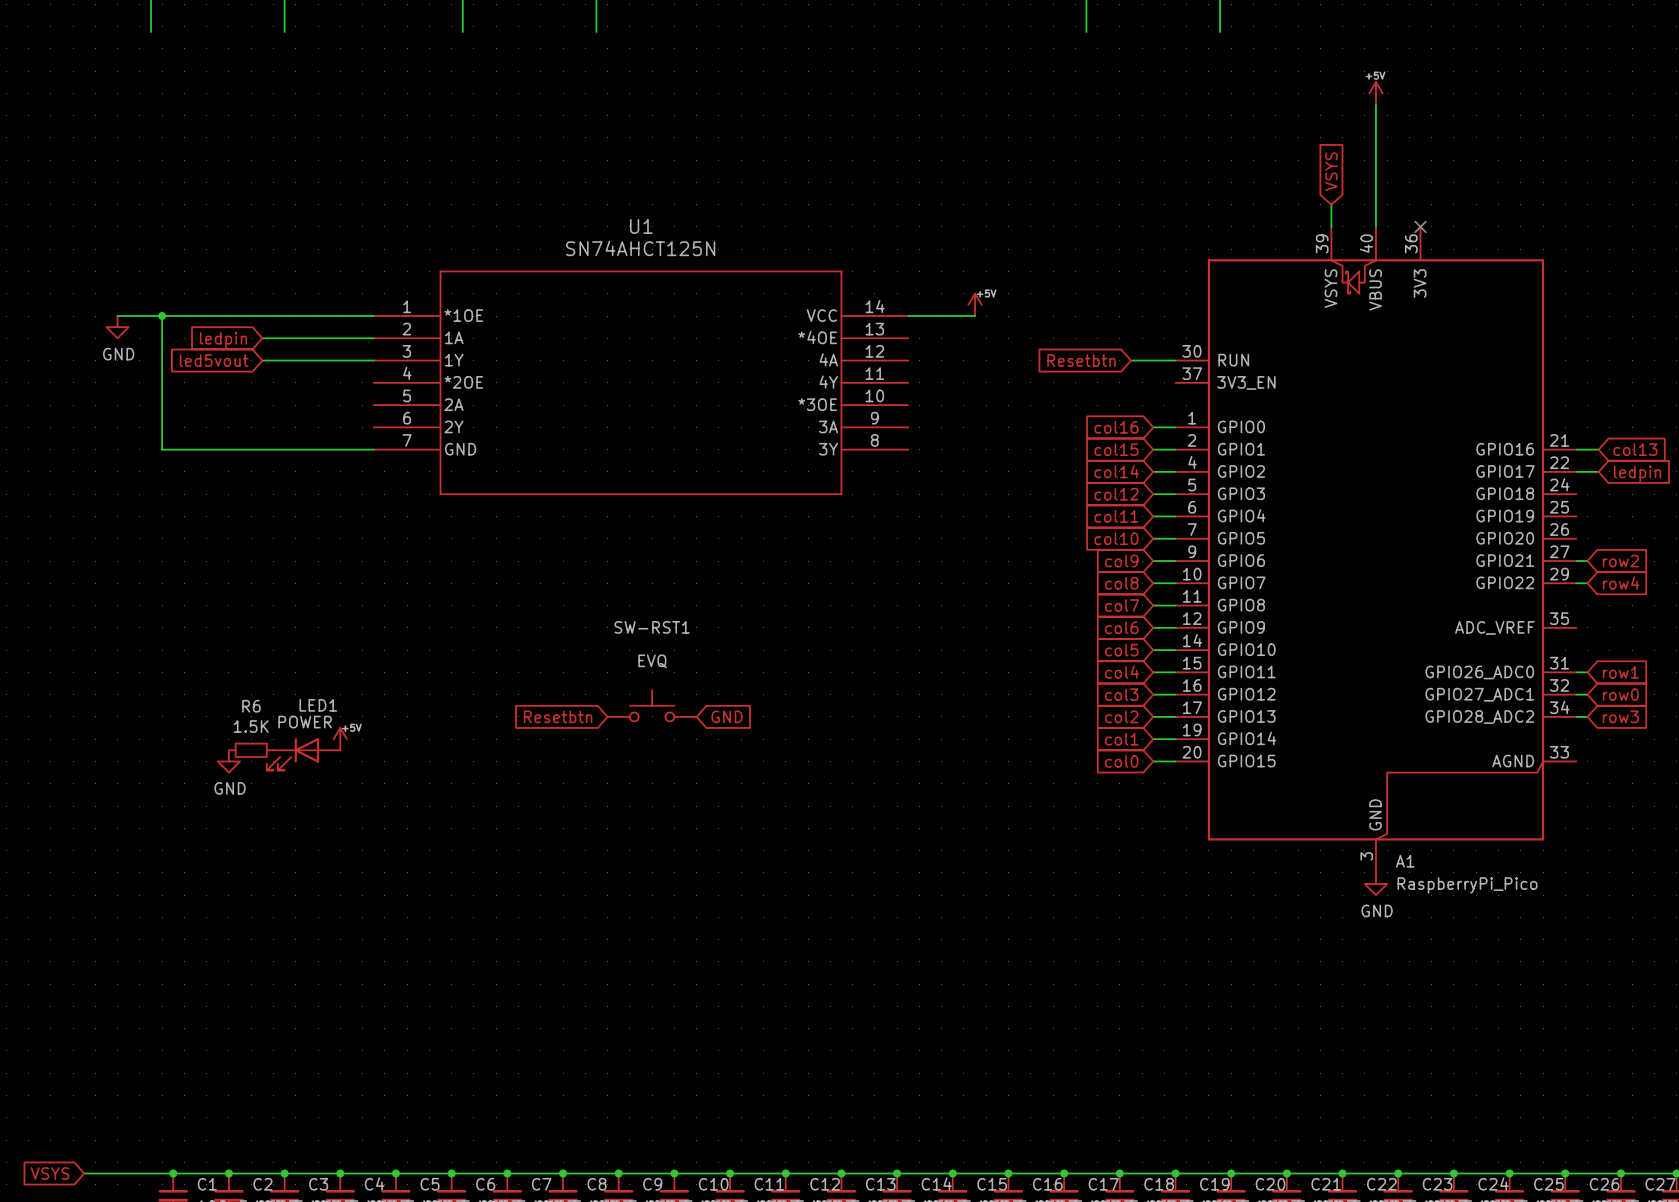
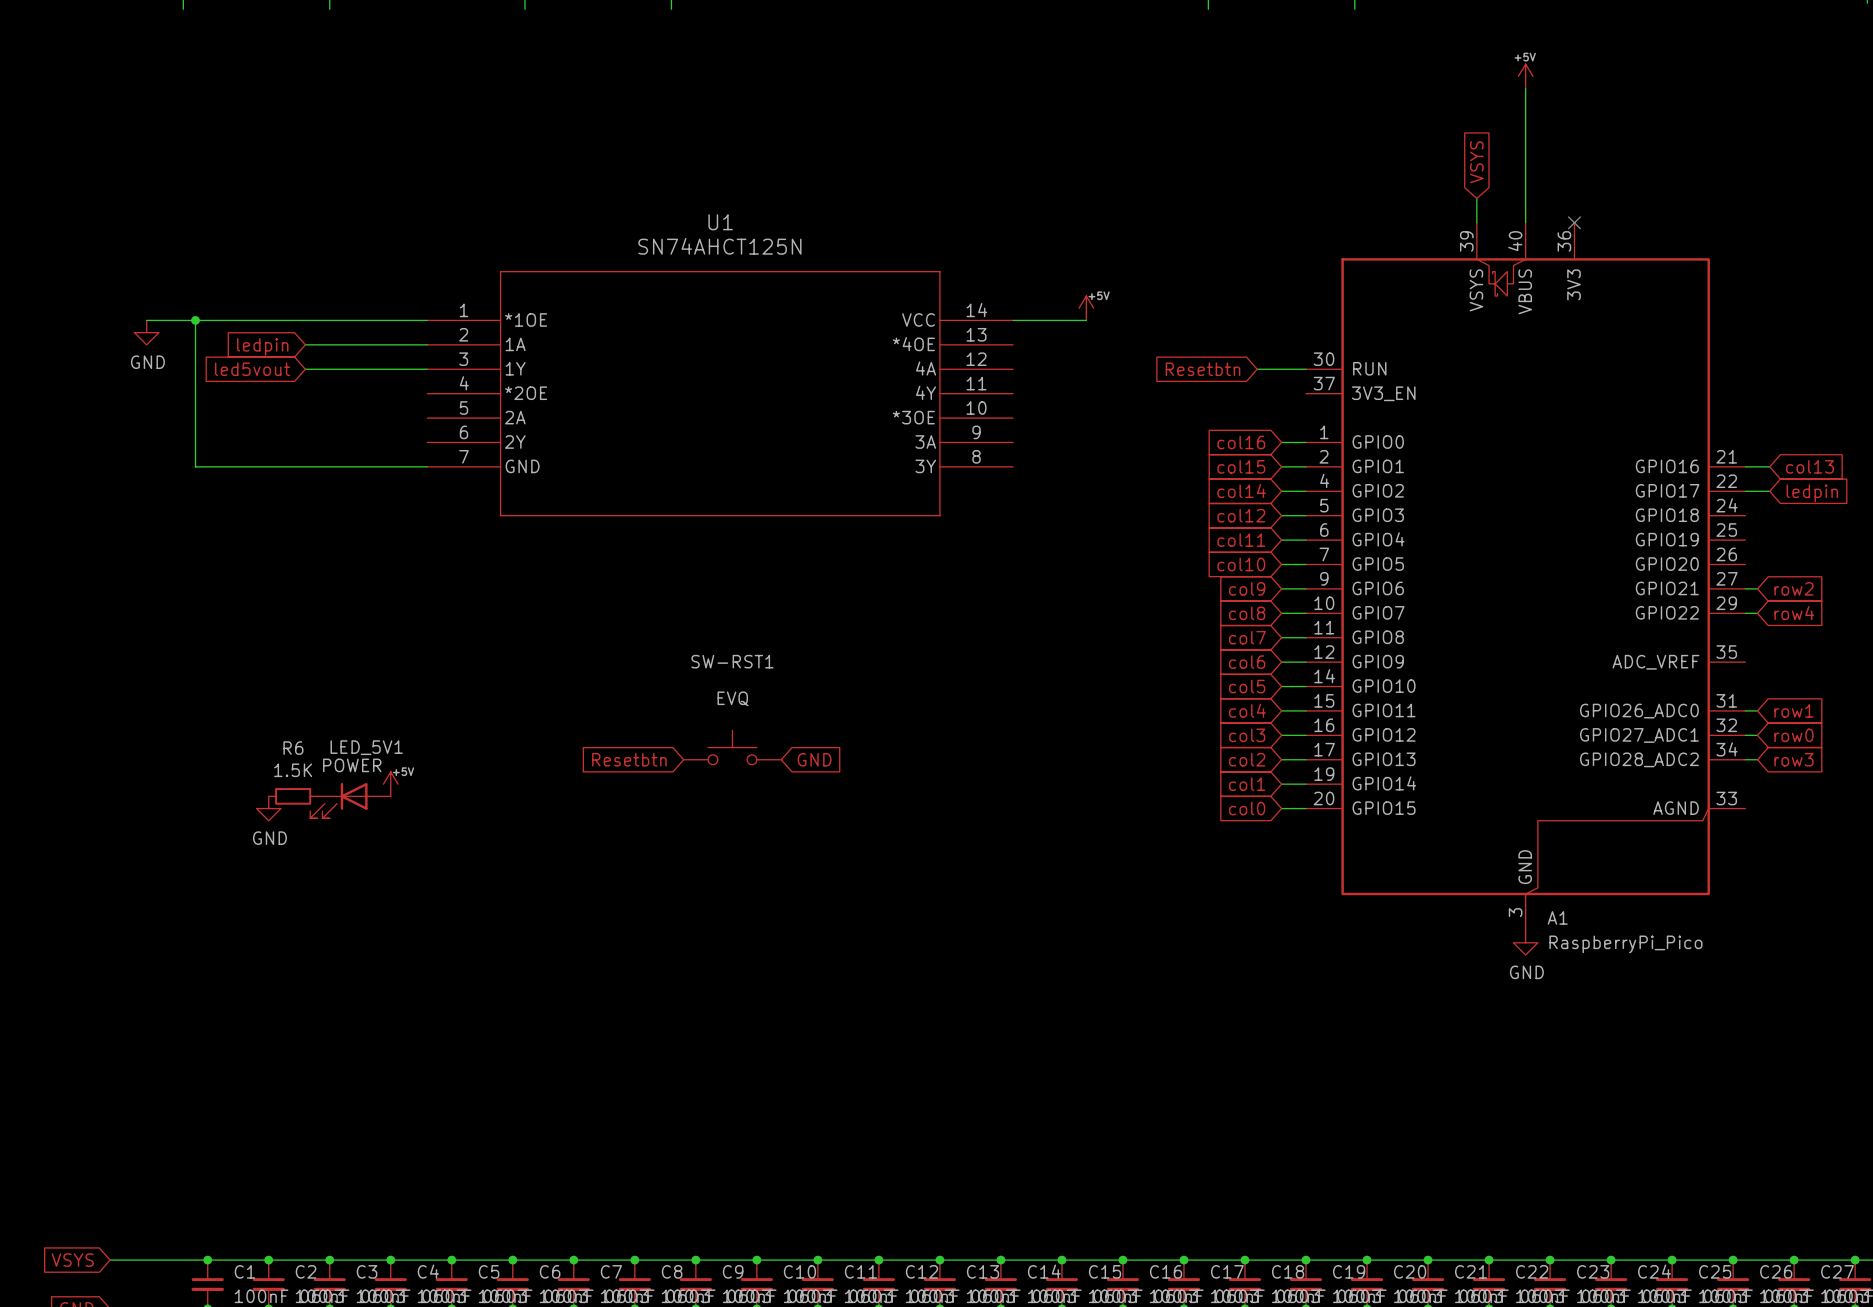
LED1 name: LED1 (318, 705) -> LED_5V1 (366, 747)

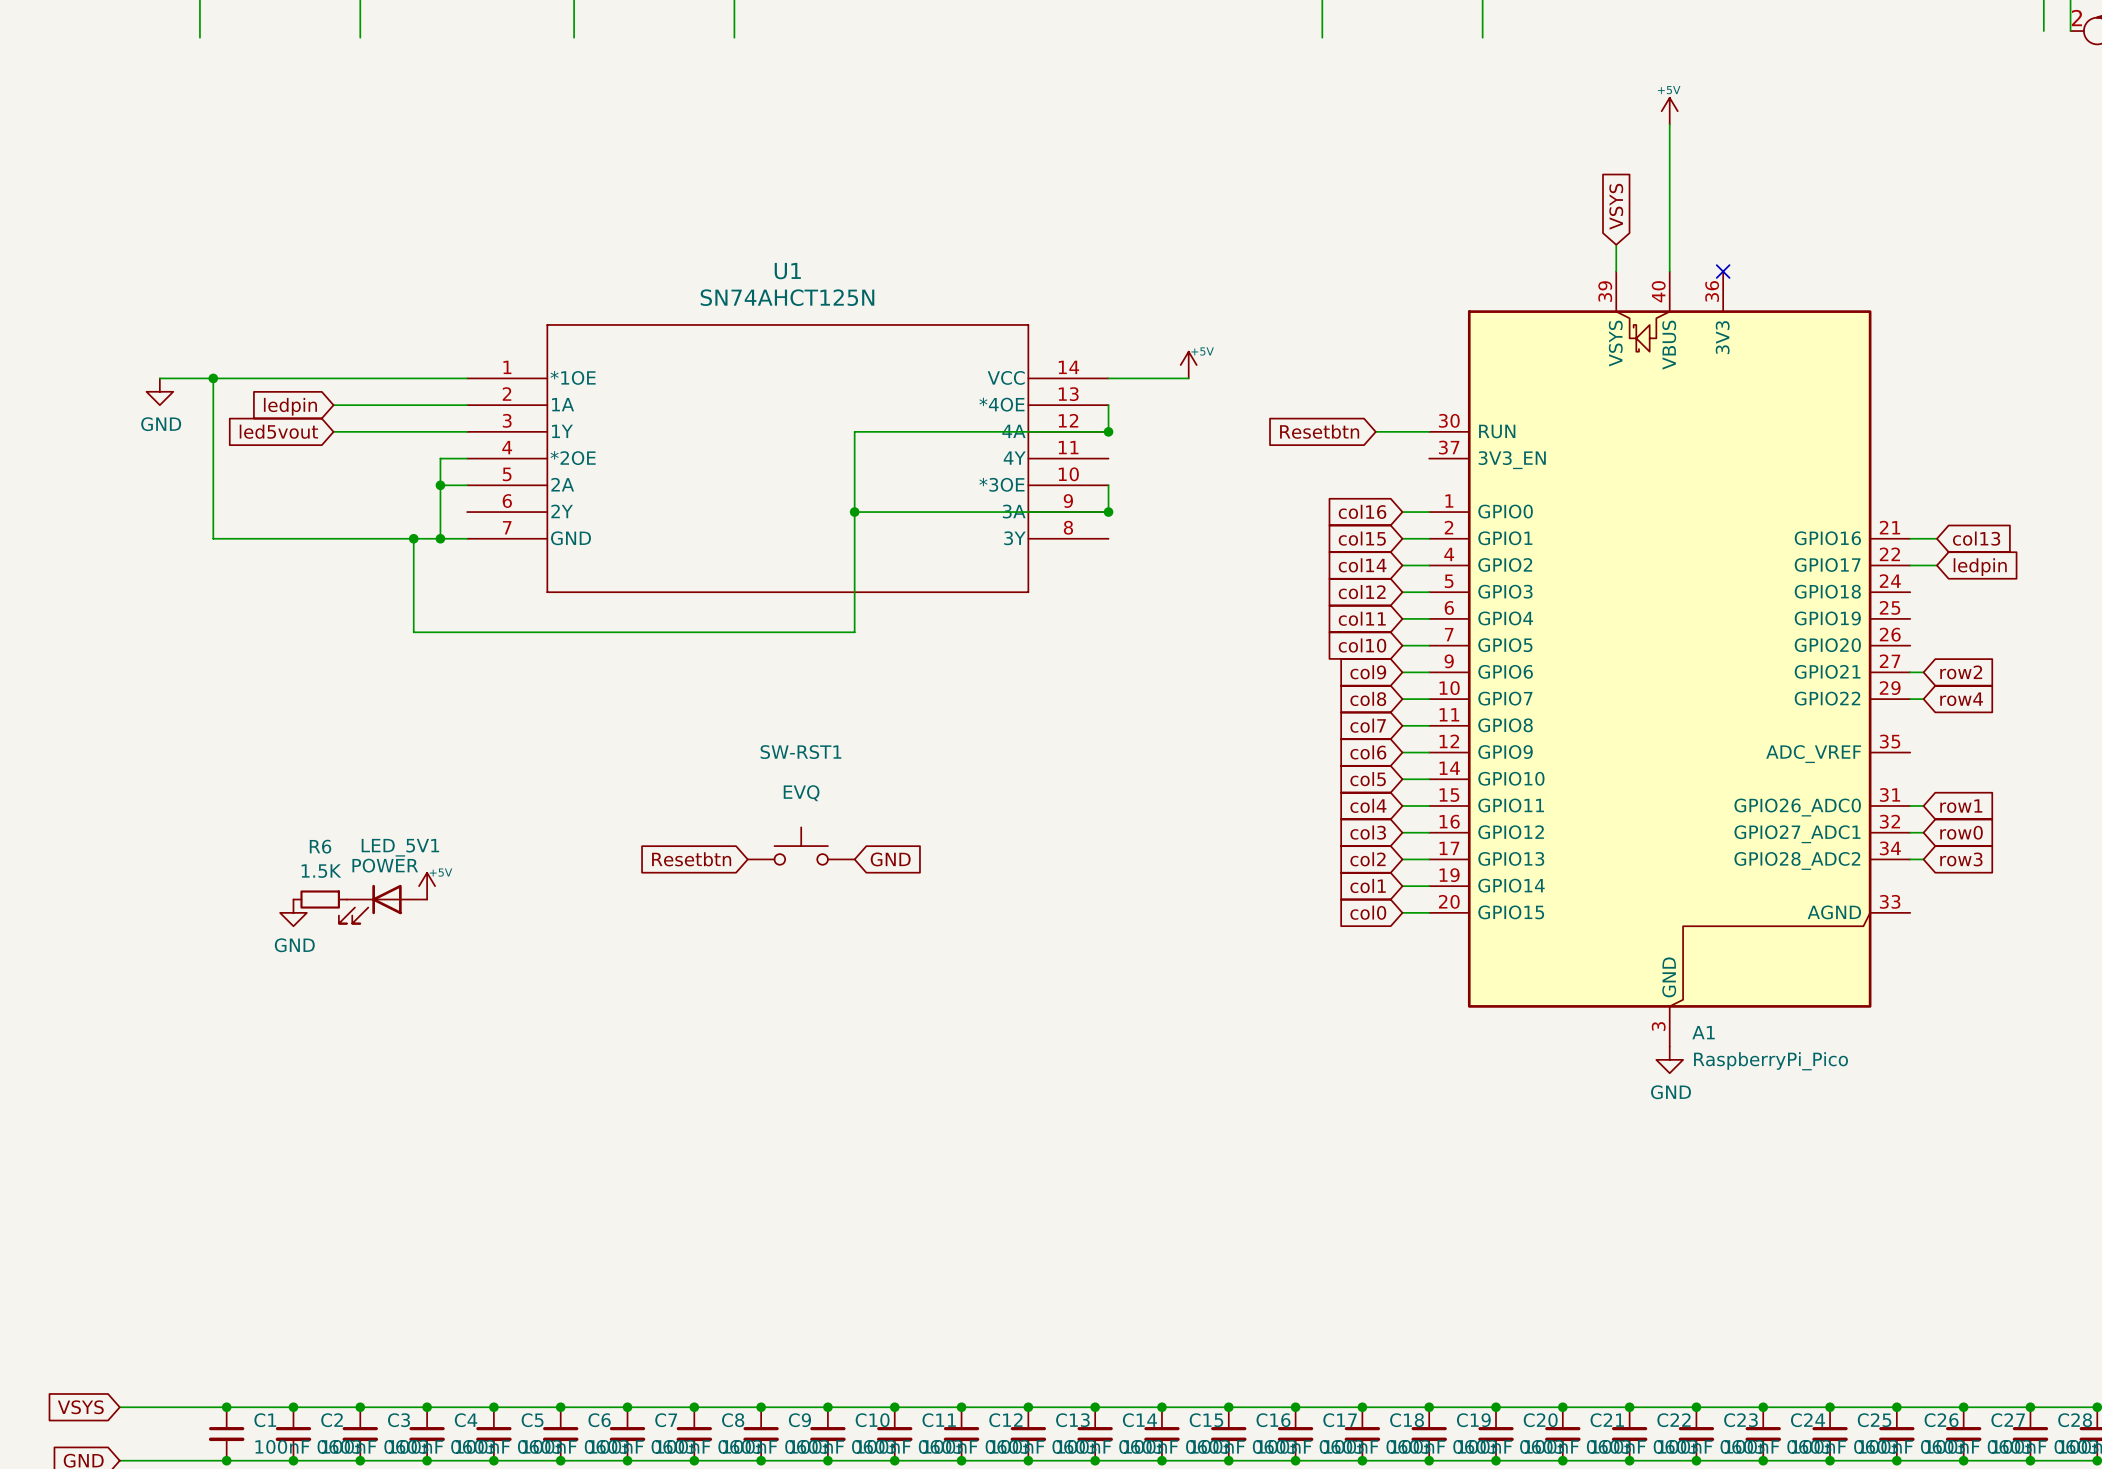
wire: none -> (1108, 405) (1108, 431) (854, 431) (854, 632) (413, 632) (413, 538)
junction: none -> (1108, 431)
wire: none -> (467, 458) (440, 458) (440, 538)
wire: none -> (440, 485) (467, 485)
junction: none -> (440, 485)
wire: none -> (1108, 485) (1108, 512) (854, 512)
junction: none -> (854, 512)
junction: none -> (1108, 512)
junction: none -> (413, 538)
junction: none -> (440, 538)

